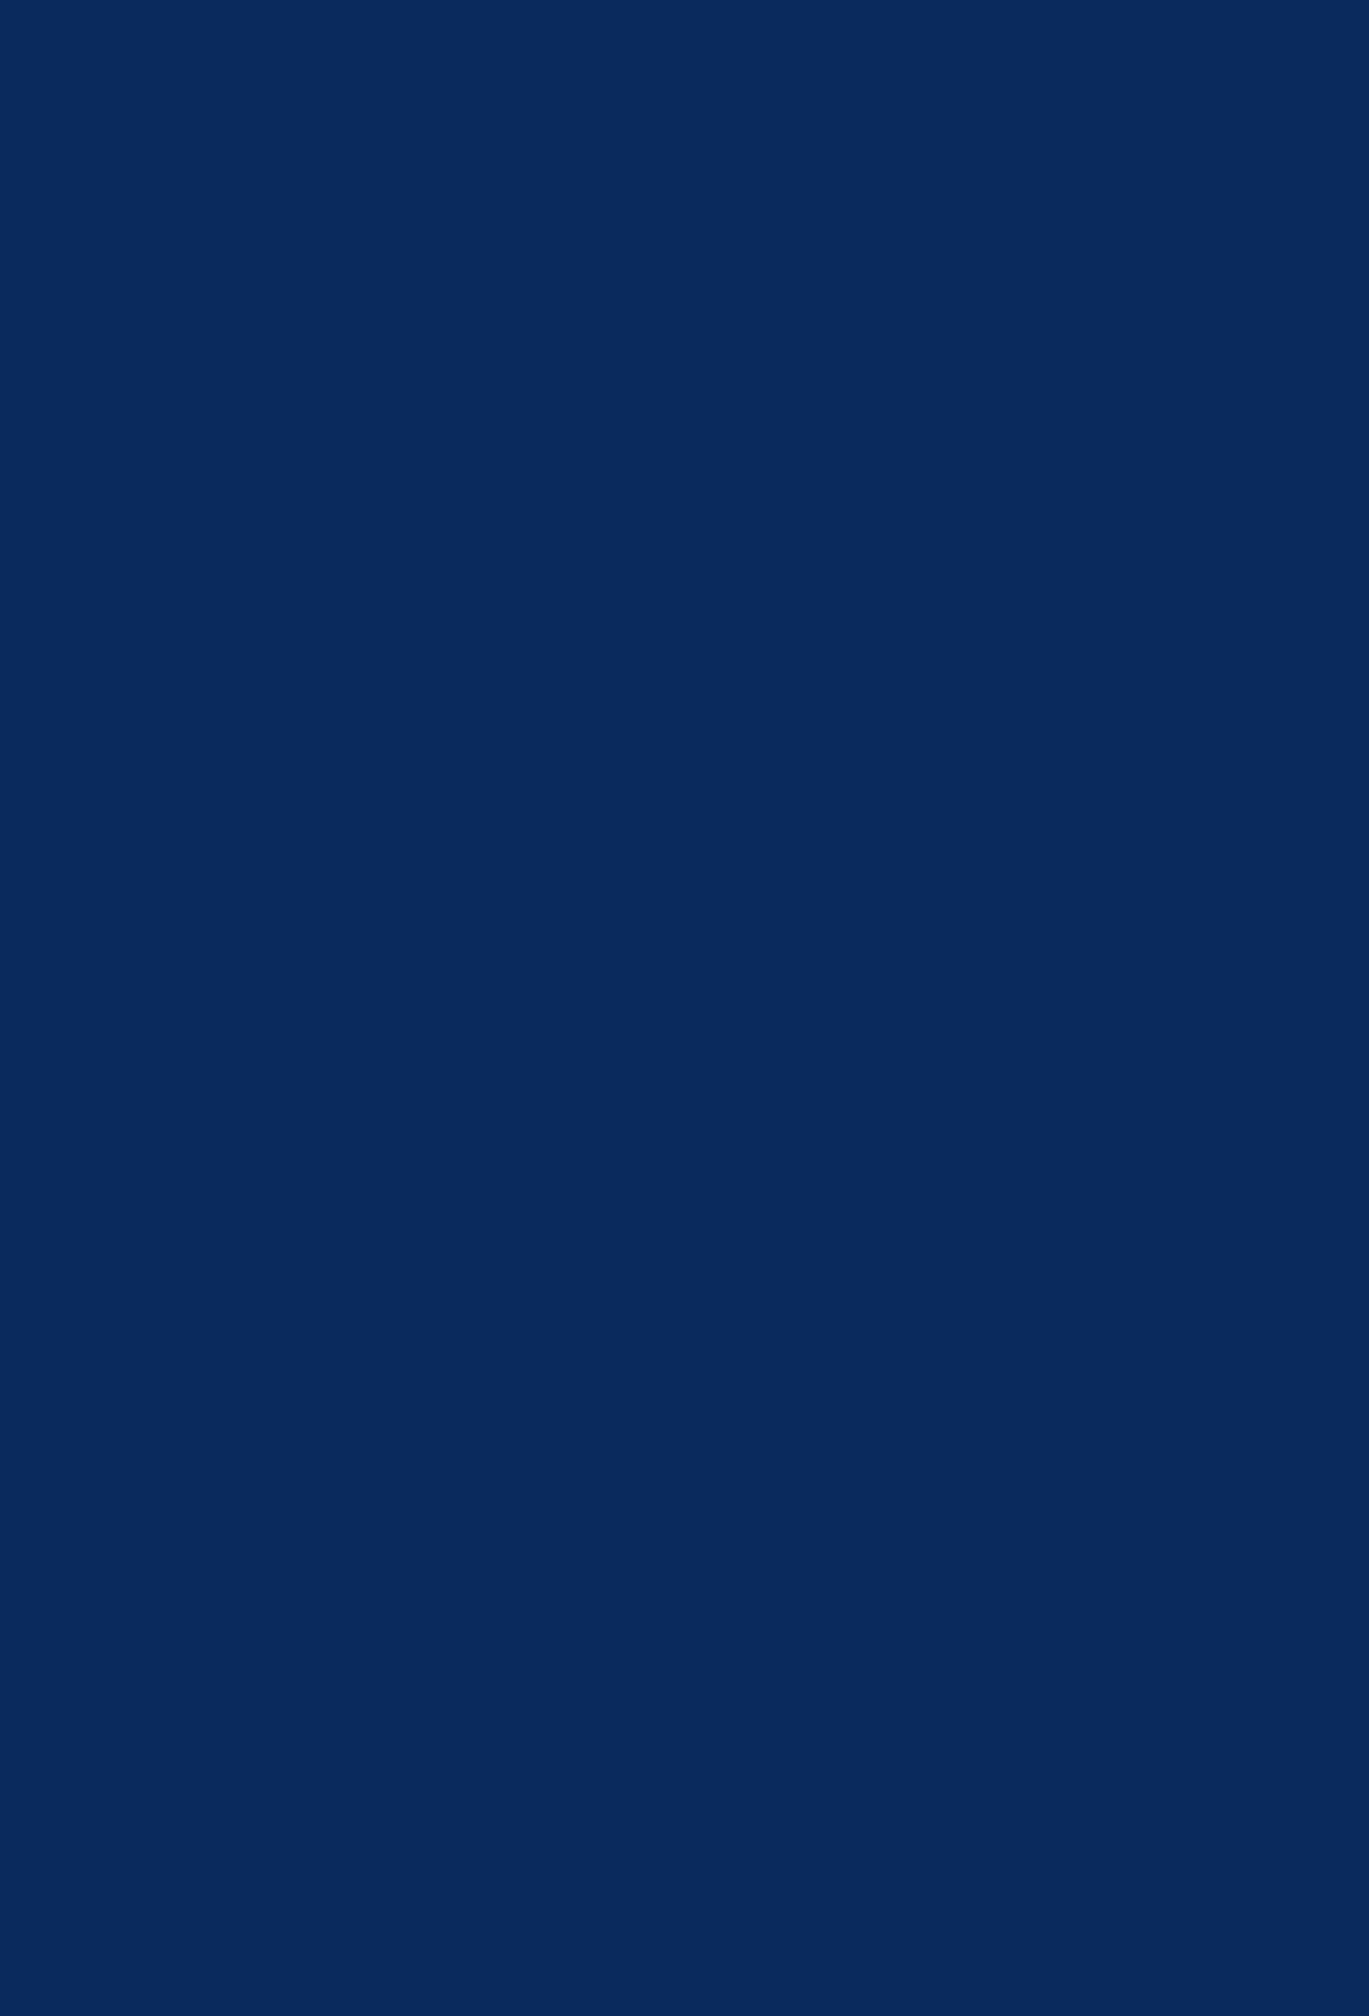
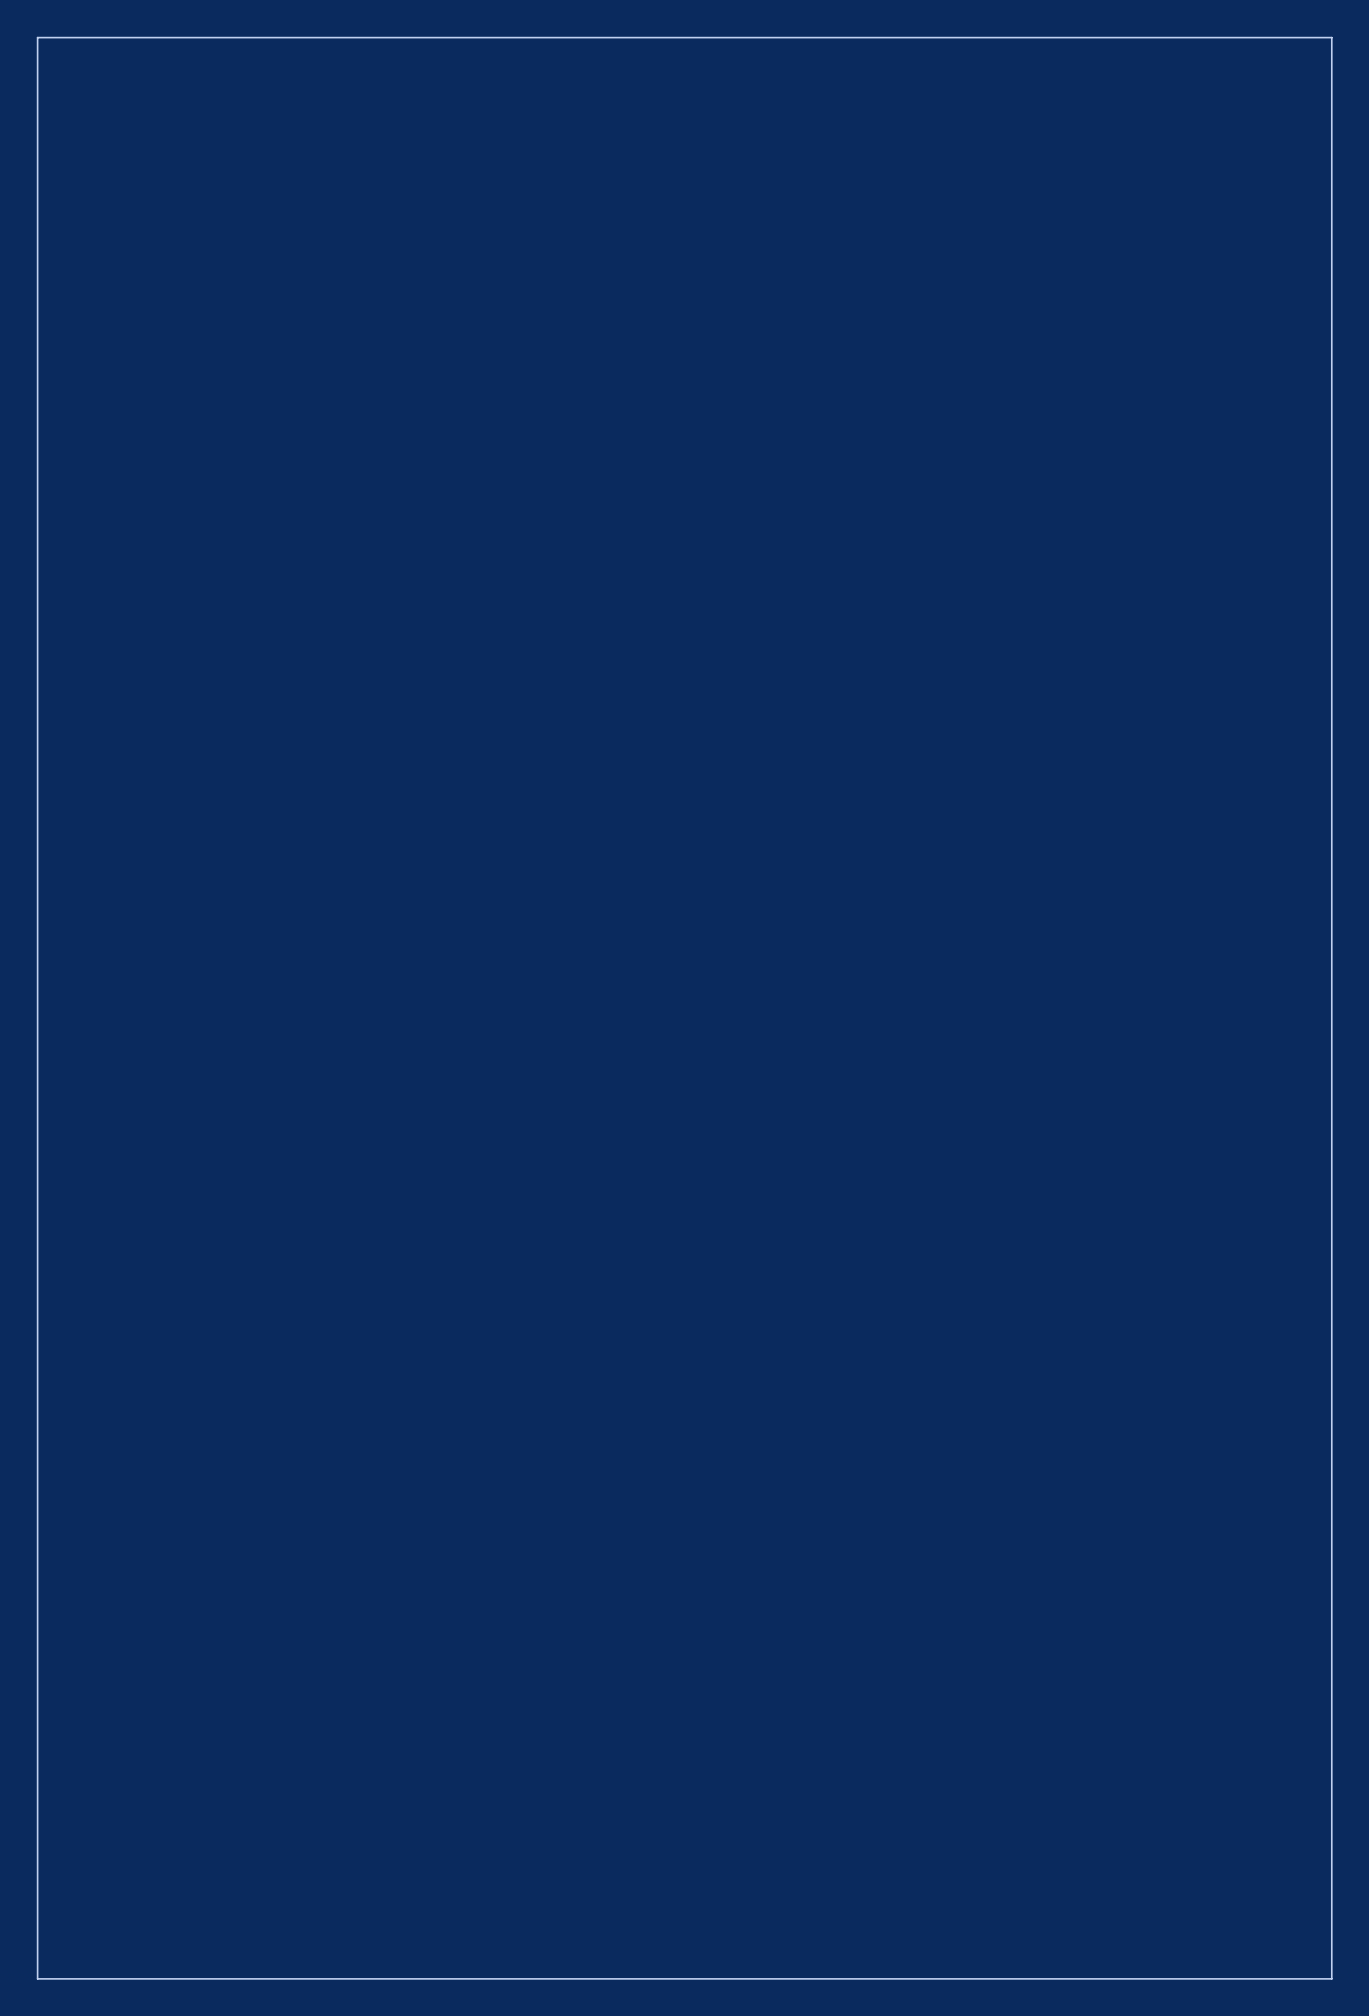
board edge: none -> (1331, 37) (37, 37) (37, 1978) (1331, 1978) (1331, 37)

